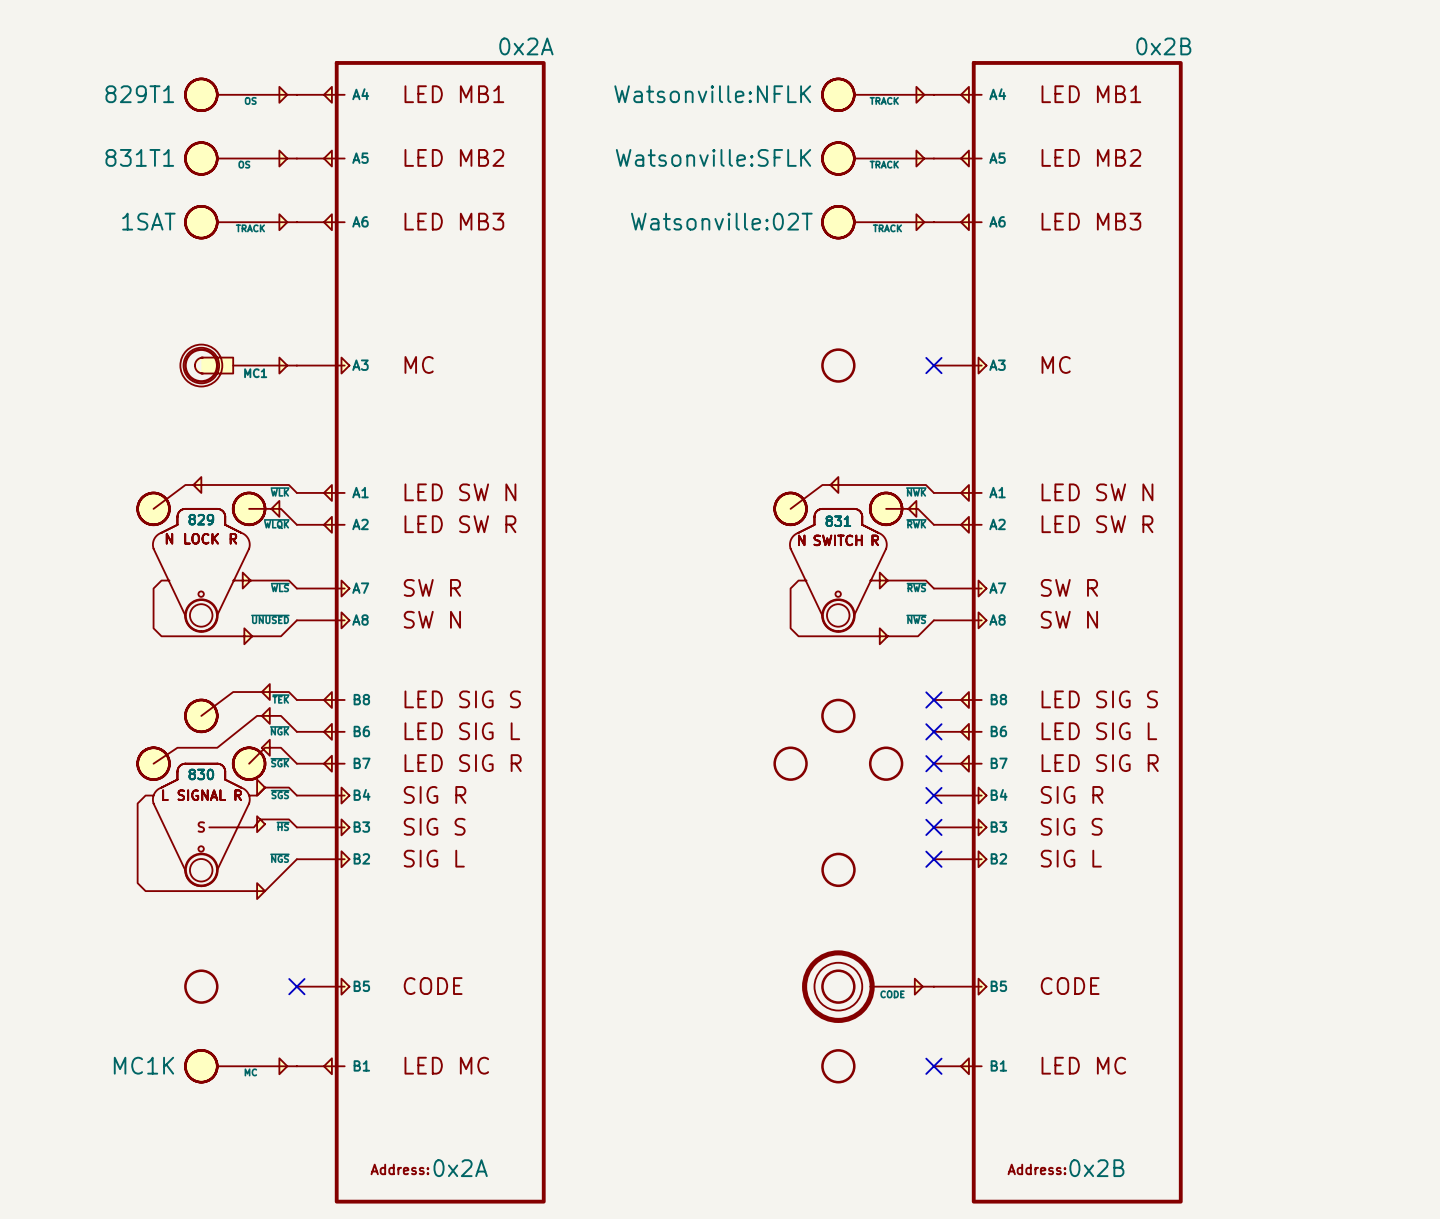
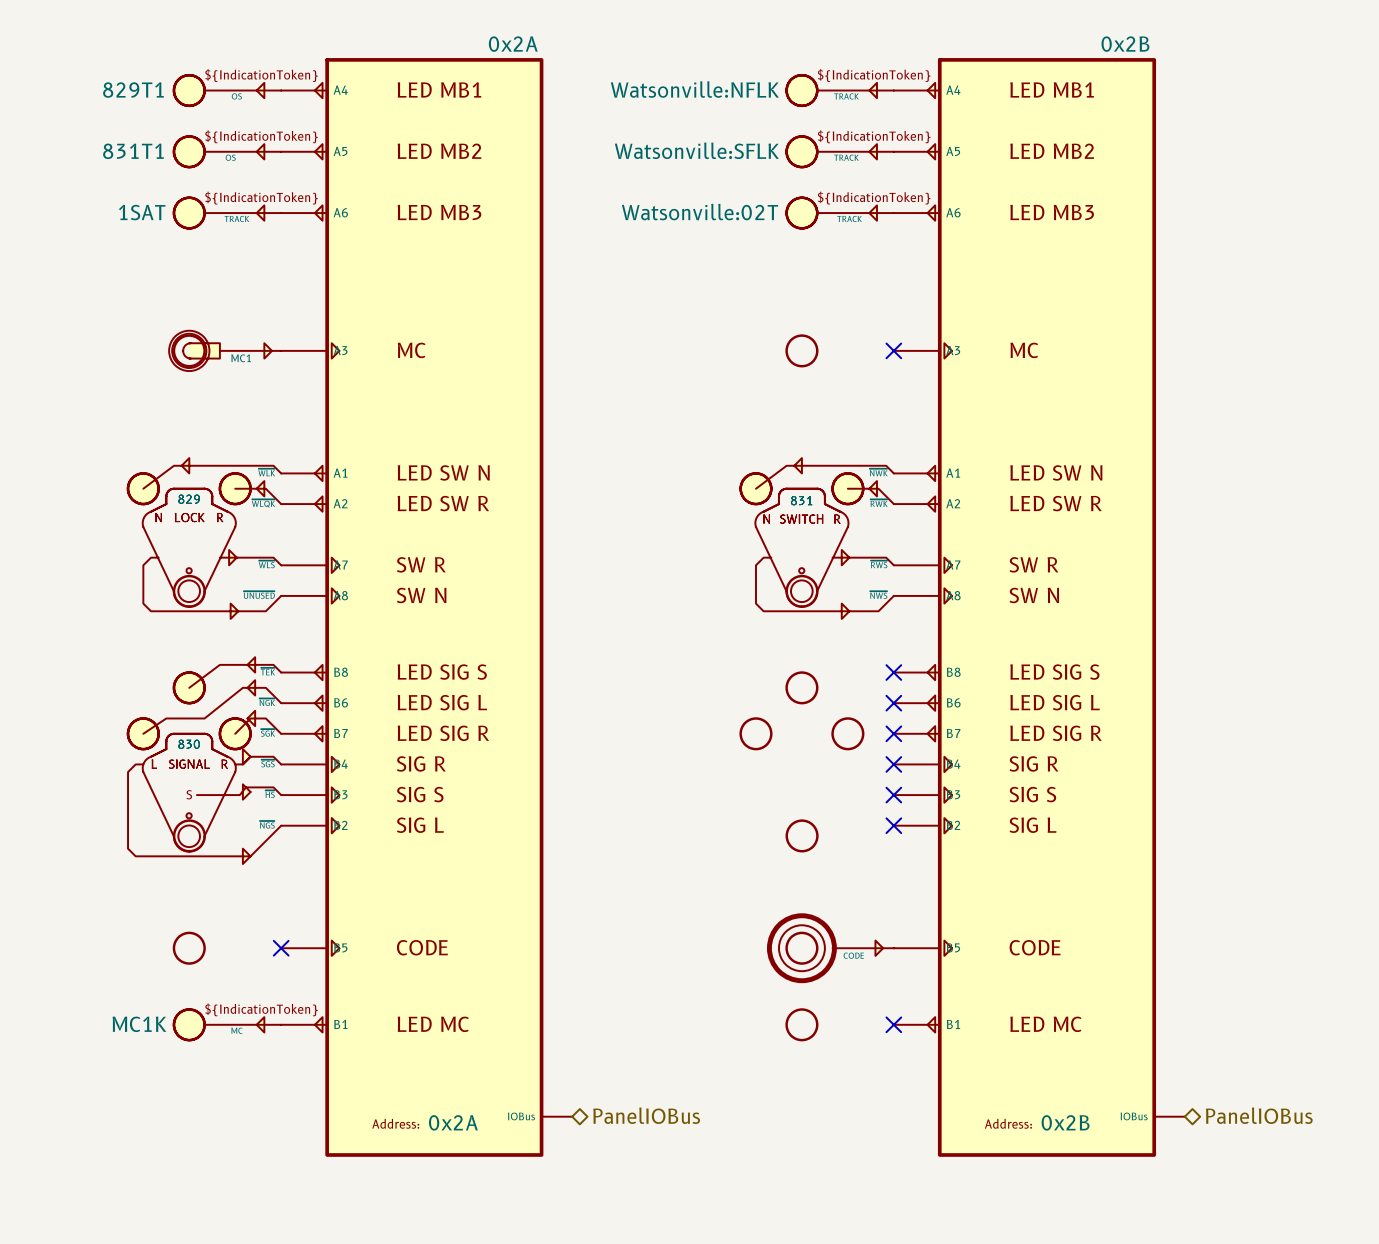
part symbol: [184, 77, 297, 113] -> [172, 73, 282, 108]
part symbol: [821, 77, 934, 113] -> [785, 73, 894, 108]
part symbol: [184, 141, 297, 176] -> [172, 135, 282, 169]
part symbol: [821, 141, 934, 176] -> [785, 135, 894, 169]
part symbol: [184, 205, 297, 240] -> [172, 196, 282, 230]
part symbol: [821, 205, 934, 240] -> [785, 196, 894, 230]
part: 0x2A (421, 632) -> none
part: none -> 0x2A (426, 607)
part: 0x2B (1058, 632) -> none
part: none -> 0x2B (1039, 607)
part symbol: [184, 1049, 297, 1084] -> [172, 1008, 282, 1042]
hierarchical label: none -> PanelIOBus (646, 1115)
hierarchical label: none -> PanelIOBus (1259, 1115)

